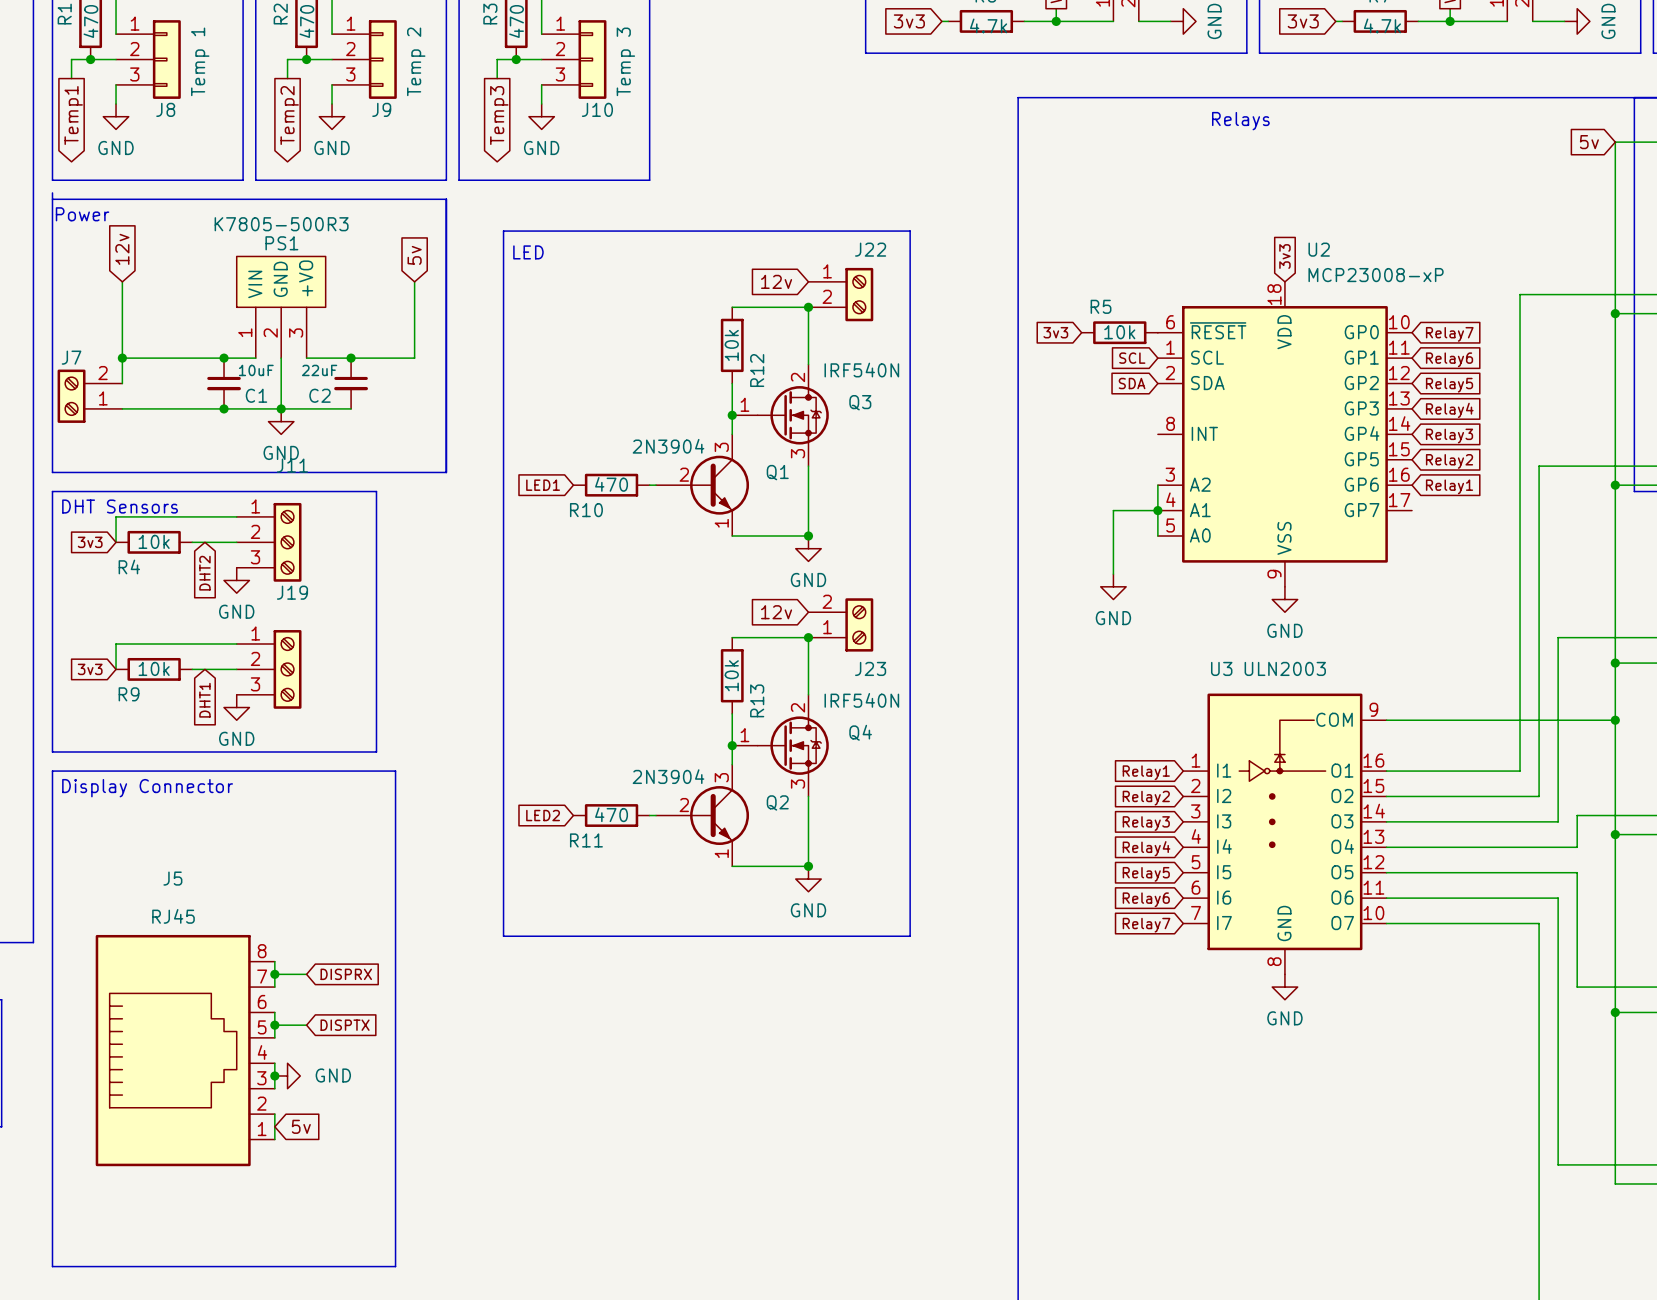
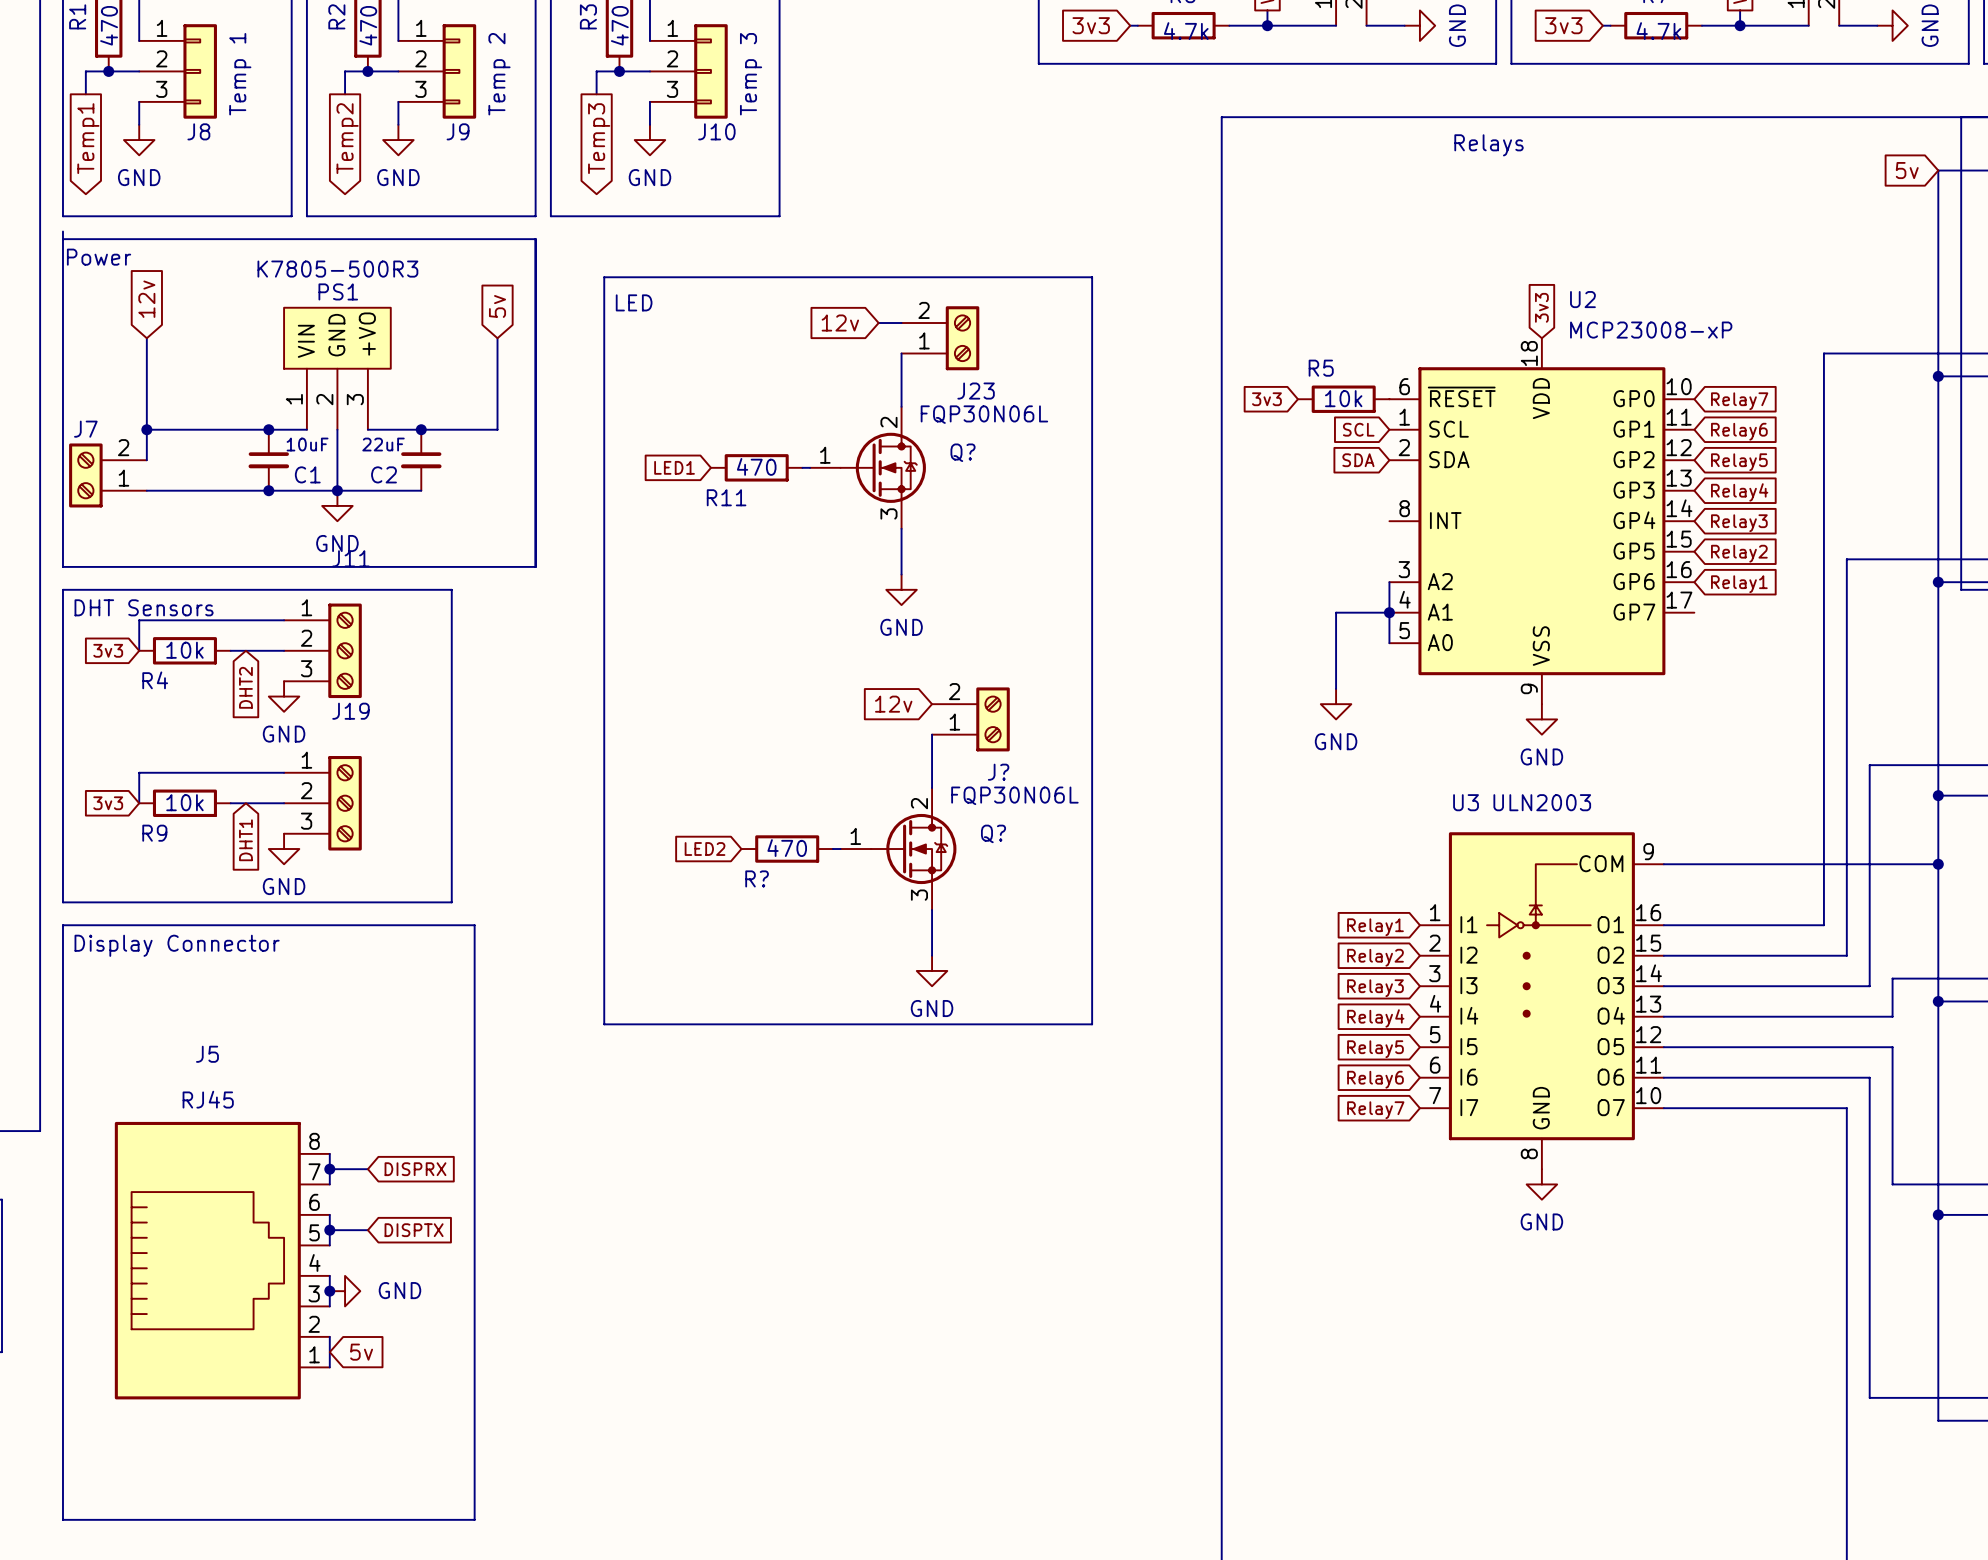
wire: none -> (878, 323) (901, 323)
global label position: 12v (776, 281) -> 12v (840, 323)
wire: none -> (901, 353) (901, 406)
J22: (840, 294) -> none
wire: (732, 307) (808, 307) (808, 364) -> none
junction: (808, 307) -> none
R12: 10k (732, 345) -> none
wire: (732, 383) (732, 434) -> none
Q?: none -> FQP30N06L (868, 467)
junction: (732, 415) -> none
Q3: IRF540N (780, 415) -> none
wire: none -> (901, 528) (901, 574)
wire: (808, 466) (808, 535) (732, 535) -> none
global label position: LED1 (543, 485) -> LED1 (674, 467)
R10: 470 (611, 485) -> none
wire: (649, 485) (656, 485) -> (802, 467) (810, 467)
Q1: 2N3904 (702, 485) -> none
junction: (808, 535) -> none
power symbol position: GND (808, 548) -> GND (901, 589)
J?: none -> (970, 719)
wire: none -> (932, 734) (932, 788)
global label position: 12v (776, 612) -> 12v (893, 704)
J23 position: (840, 624) -> (940, 338)
wire: (732, 637) (808, 637) (808, 694) -> none
junction: (808, 637) -> none
R13: 10k (732, 675) -> none
R?: none -> 470 (787, 849)
Q?: none -> FQP30N06L (898, 849)
wire: (732, 713) (732, 764) -> none
junction: (732, 745) -> none
Q4: IRF540N (780, 745) -> none
wire: none -> (932, 909) (932, 955)
wire: (808, 796) (808, 866) (732, 866) -> none
global label position: LED2 (543, 815) -> LED2 (705, 849)
R11 position: (611, 815) -> (756, 467)
wire: (649, 815) (656, 815) -> (832, 849) (840, 849)
Q2: 2N3904 (702, 815) -> none
line: (503, 853) (503, 936) (910, 936) (910, 853) -> (604, 1024) (1092, 1024)
junction: (808, 866) -> none
power symbol position: GND (808, 879) -> GND (932, 970)

